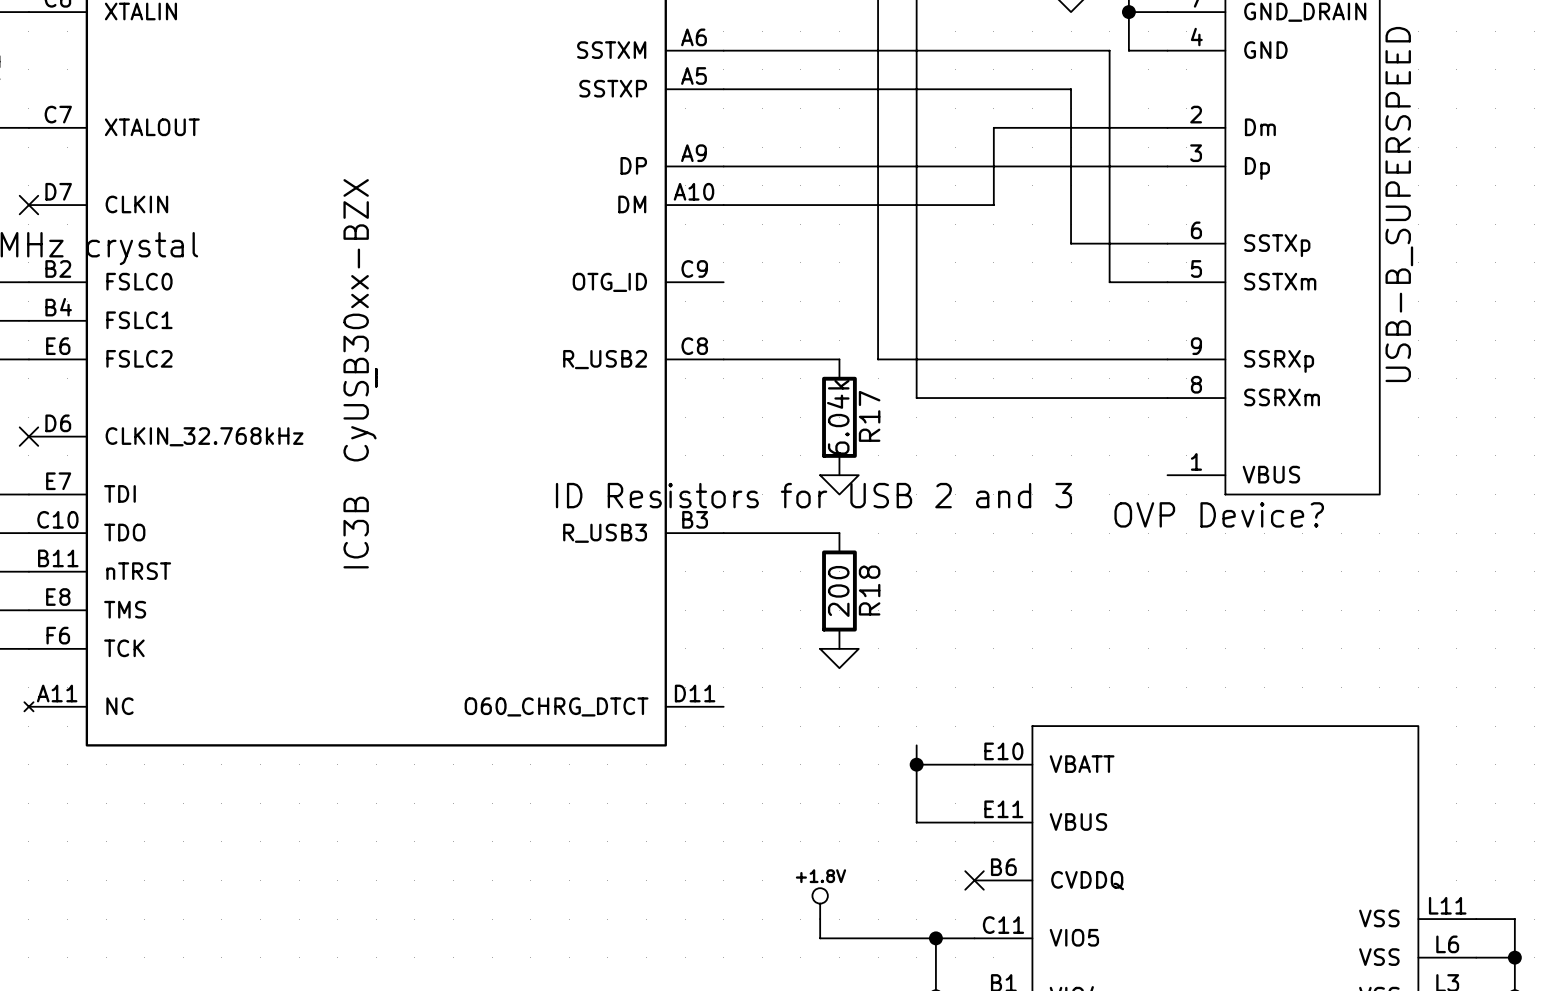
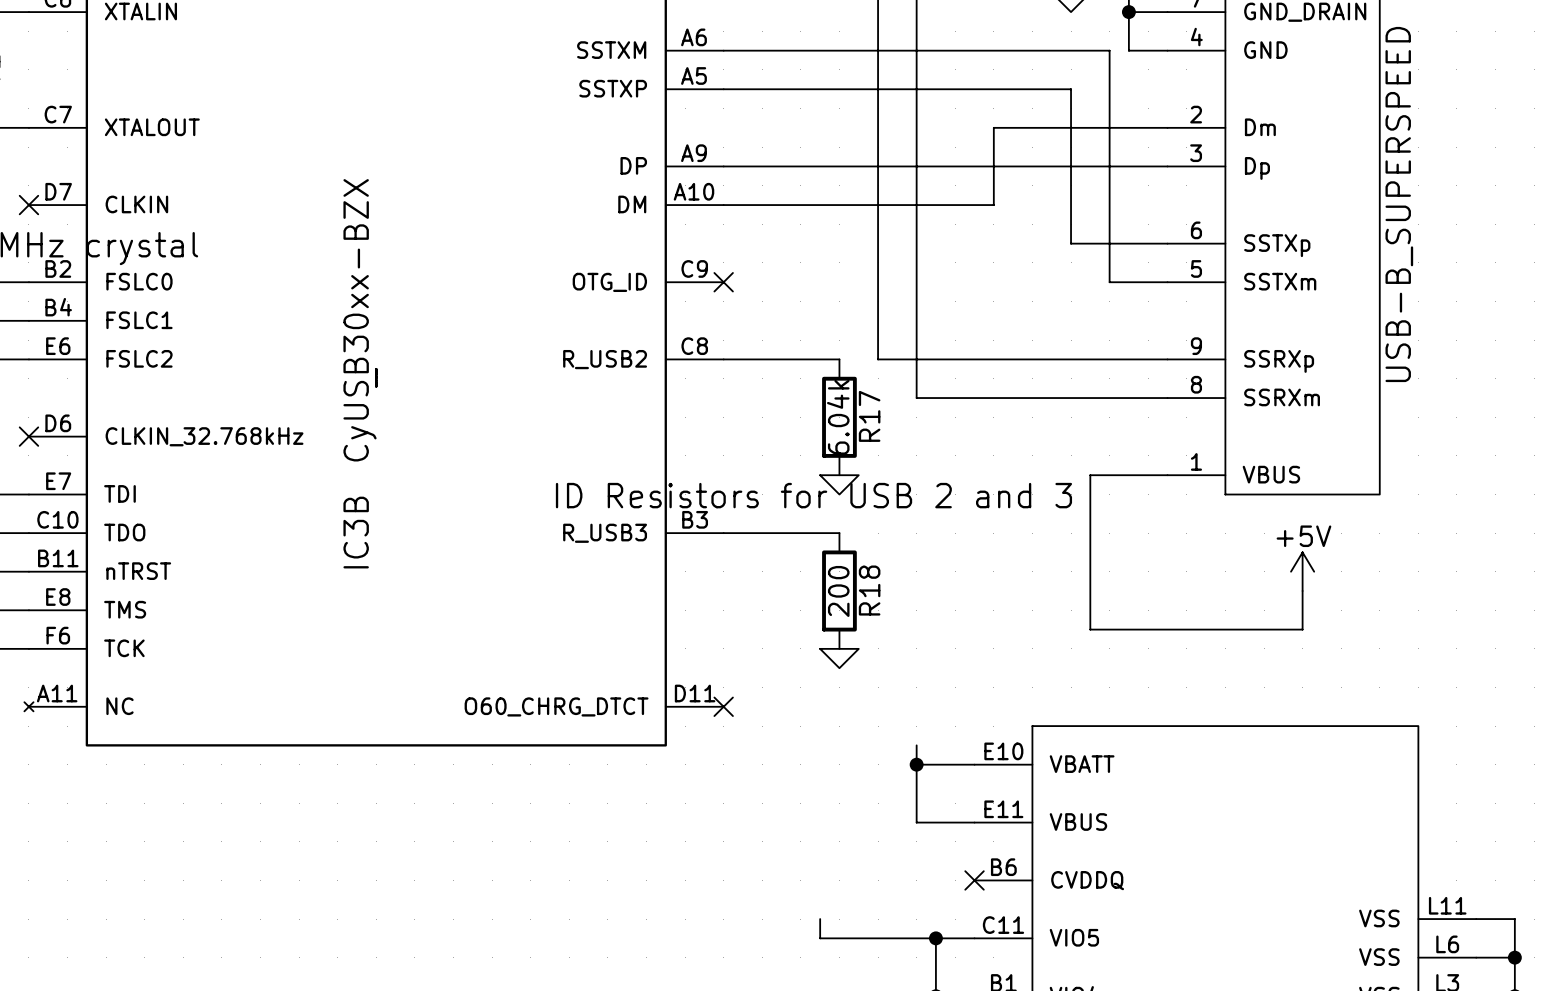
no-connect mark: none -> (723, 282)
wire: none -> (1167, 475) (1090, 475) (1090, 629) (1302, 629) (1302, 591)
text: OVP Device? (1219, 514) -> none
power symbol: none -> +5V (1302, 571)
no-connect mark: none -> (723, 706)
power symbol: +1.8V (820, 903) -> none

